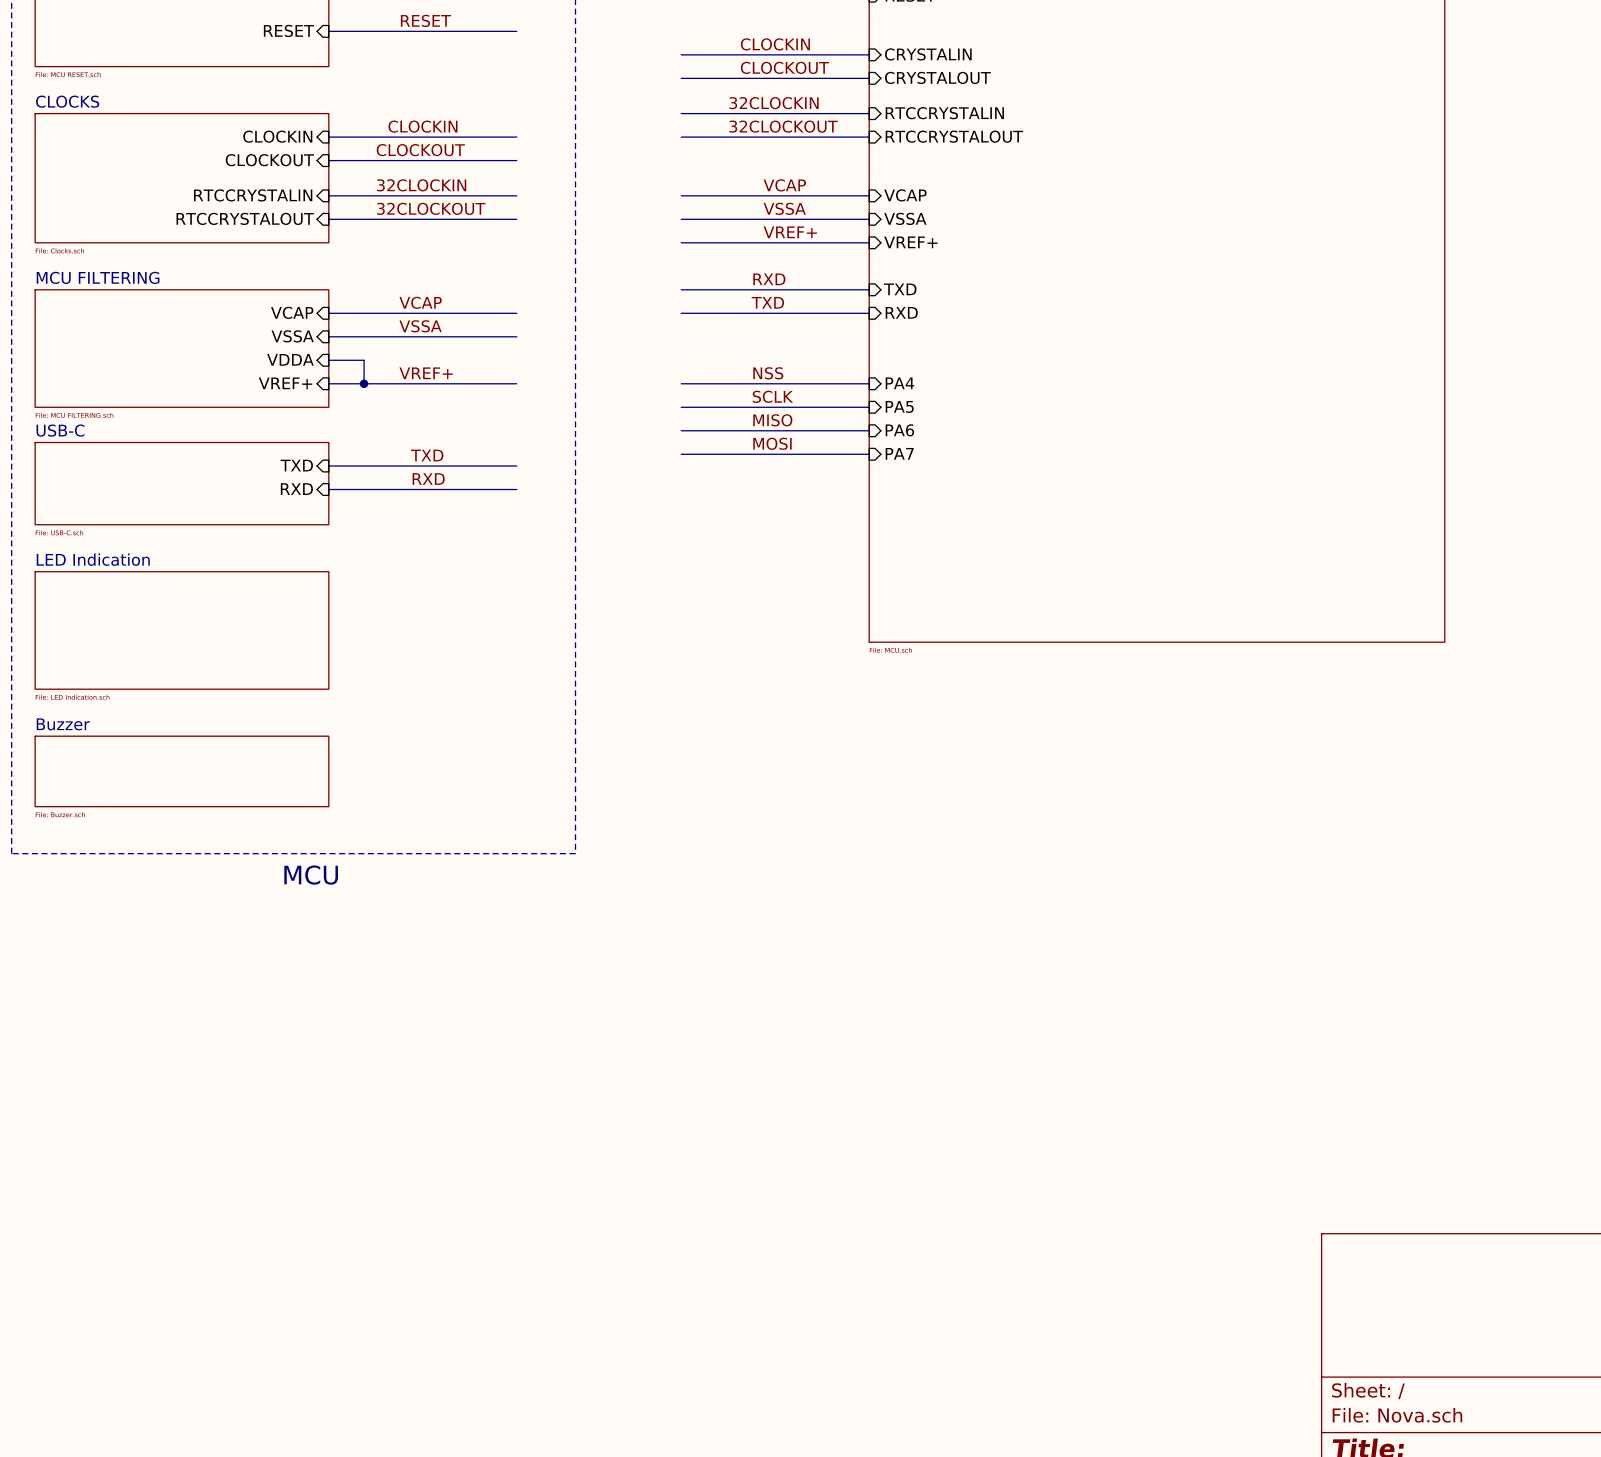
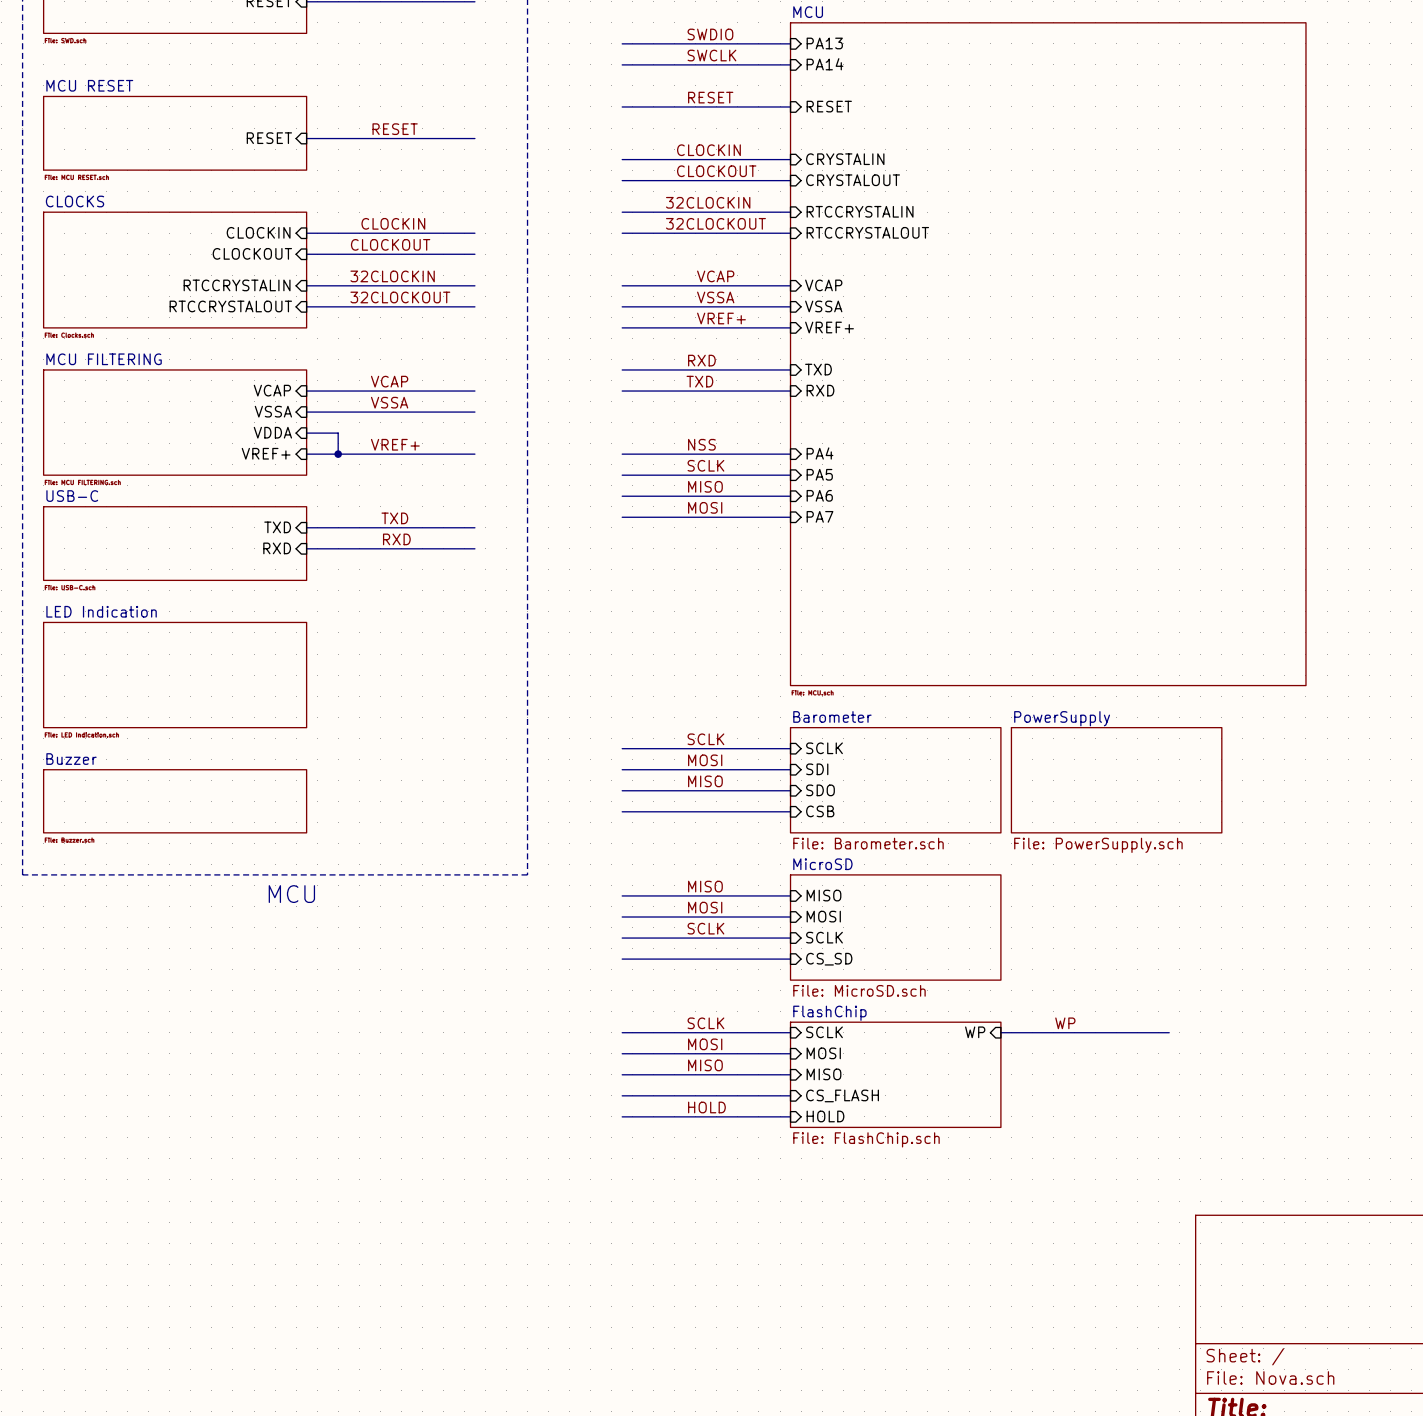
label: none -> SCLK (705, 739)
wire: none -> (622, 748) (790, 748)
sheet pin: none -> SCLK (824, 748)
label: none -> MOSI (705, 760)
sheet pin: none -> SDI (817, 769)
wire: none -> (622, 769) (790, 769)
sheet Barometer: none -> File: Barometer.sch (895, 780)
sheet PowerSupply: none -> File: PowerSupply.sch (1116, 780)
label: none -> MISO (705, 781)
wire: none -> (622, 790) (790, 790)
sheet pin: none -> SDO (820, 790)
sheet pin: none -> CSB (820, 811)
wire: none -> (622, 811) (790, 811)
label: none -> MISO (705, 886)
sheet pin: none -> MISO (823, 895)
wire: none -> (622, 895) (790, 895)
label: none -> MOSI (705, 907)
wire: none -> (622, 917) (790, 917)
sheet pin: none -> MOSI (823, 916)
sheet MicroSD: none -> File: MicroSD.sch (895, 927)
label: none -> SCLK (705, 928)
sheet pin: none -> SCLK (824, 937)
wire: none -> (622, 938) (790, 938)
wire: none -> (622, 959) (790, 959)
sheet pin: none -> CS_SD (829, 959)
label: none -> SCLK (705, 1023)
label: none -> WP (1065, 1023)
wire: none -> (622, 1032) (790, 1032)
sheet pin: none -> SCLK (824, 1032)
sheet pin: none -> WP (975, 1032)
wire: none -> (1000, 1032) (1169, 1032)
label: none -> MOSI (705, 1044)
sheet pin: none -> MOSI (823, 1053)
wire: none -> (622, 1053) (790, 1053)
label: none -> MISO (705, 1065)
wire: none -> (622, 1074) (790, 1074)
sheet pin: none -> MISO (823, 1074)
sheet FlashChip: none -> File: FlashChip.sch (895, 1074)
wire: none -> (622, 1095) (790, 1095)
sheet pin: none -> CS_FLASH (842, 1095)
label: none -> HOLD (706, 1107)
wire: none -> (622, 1116) (790, 1116)
sheet pin: none -> HOLD (825, 1116)

